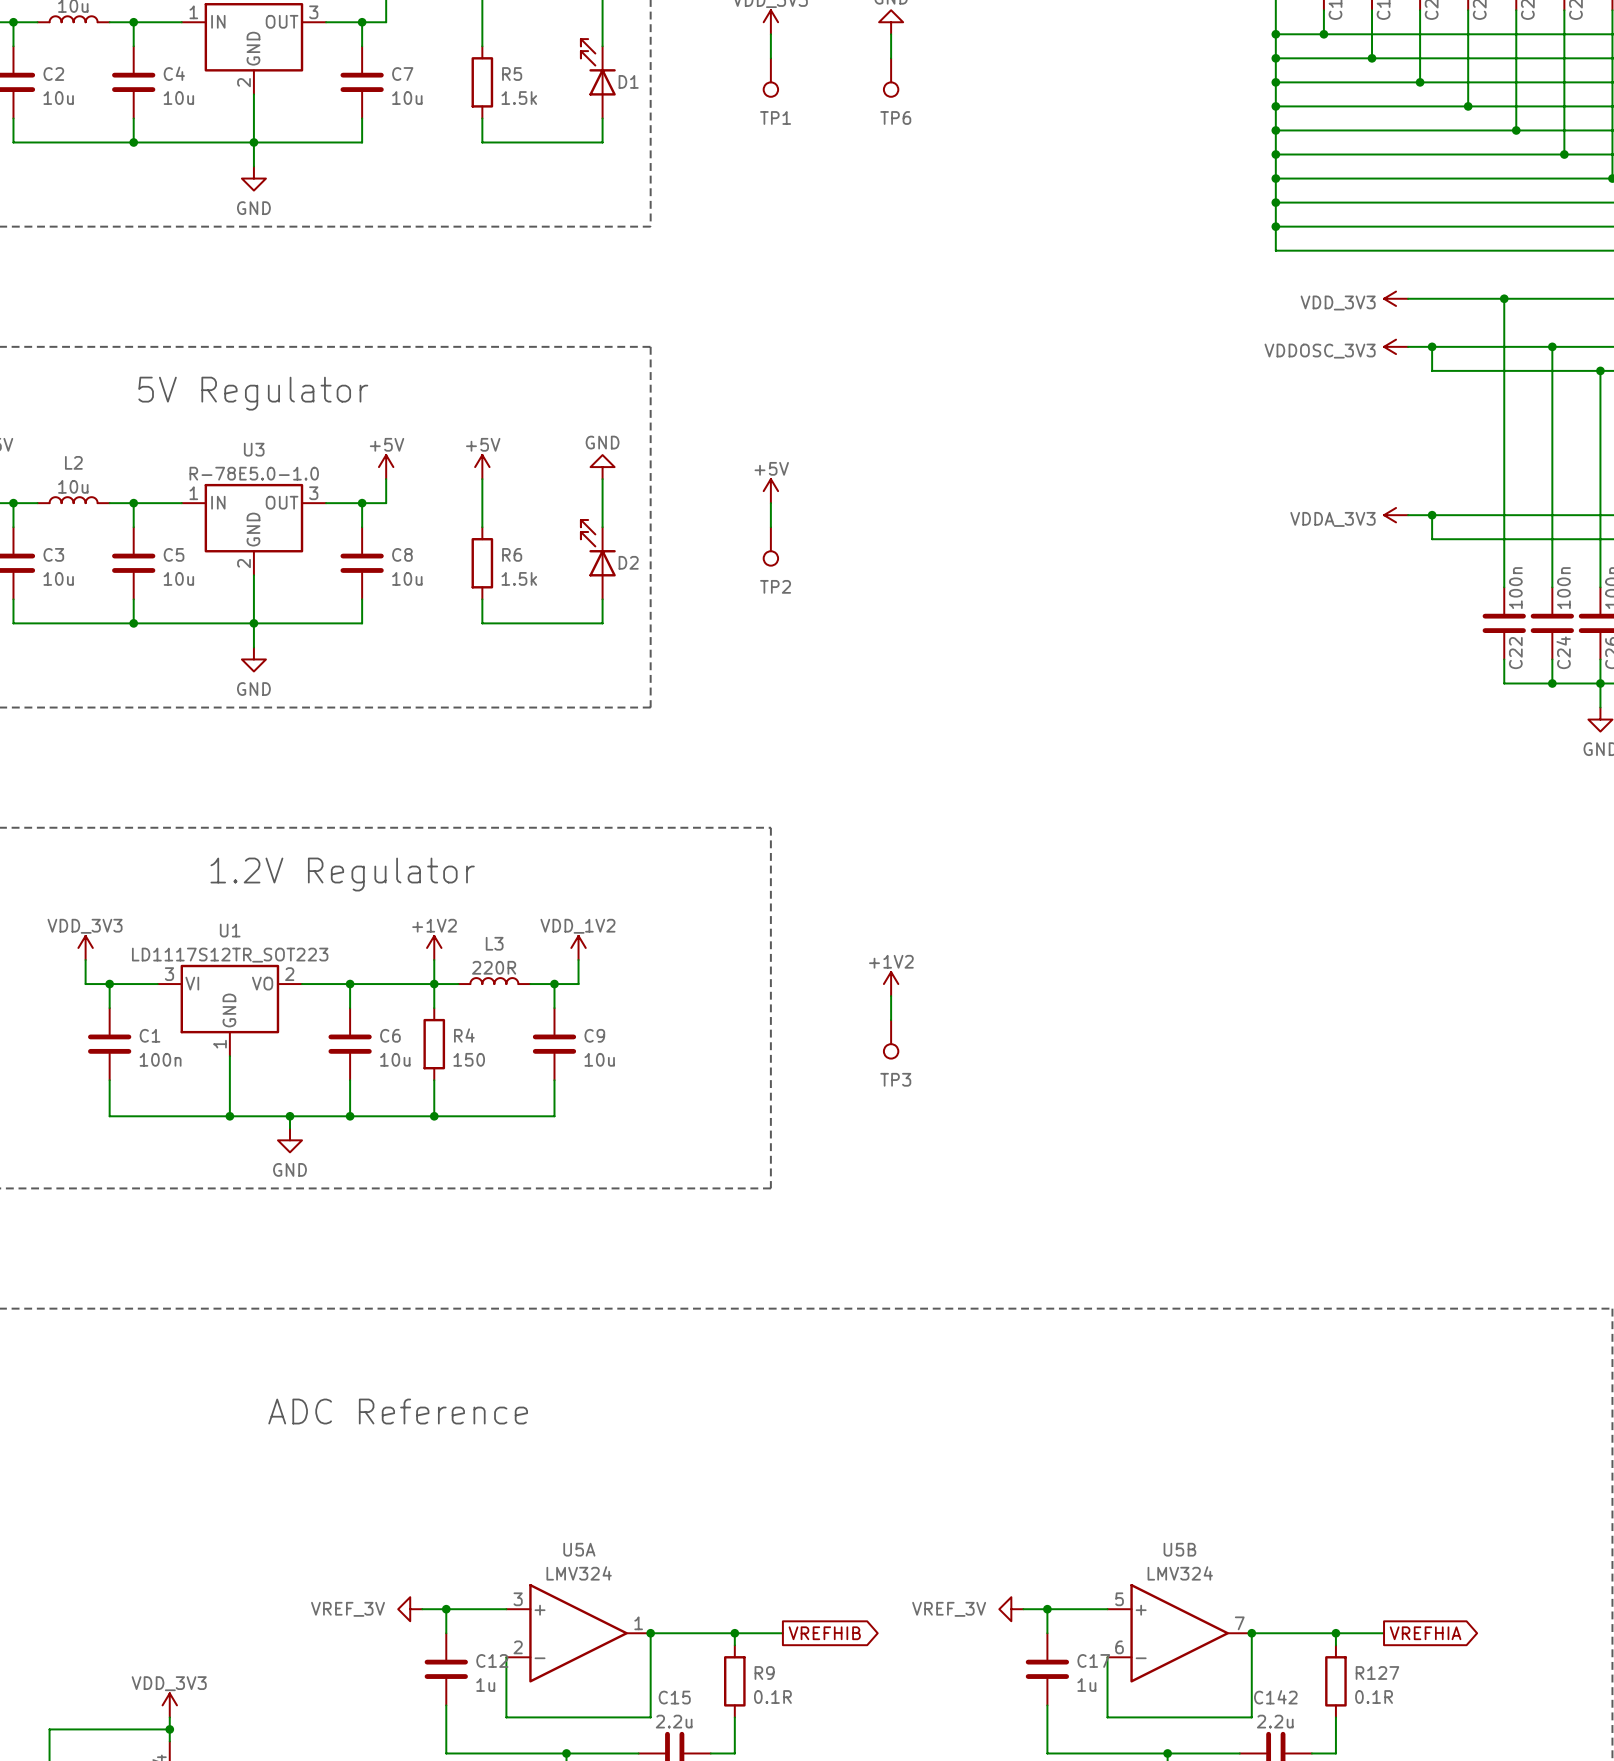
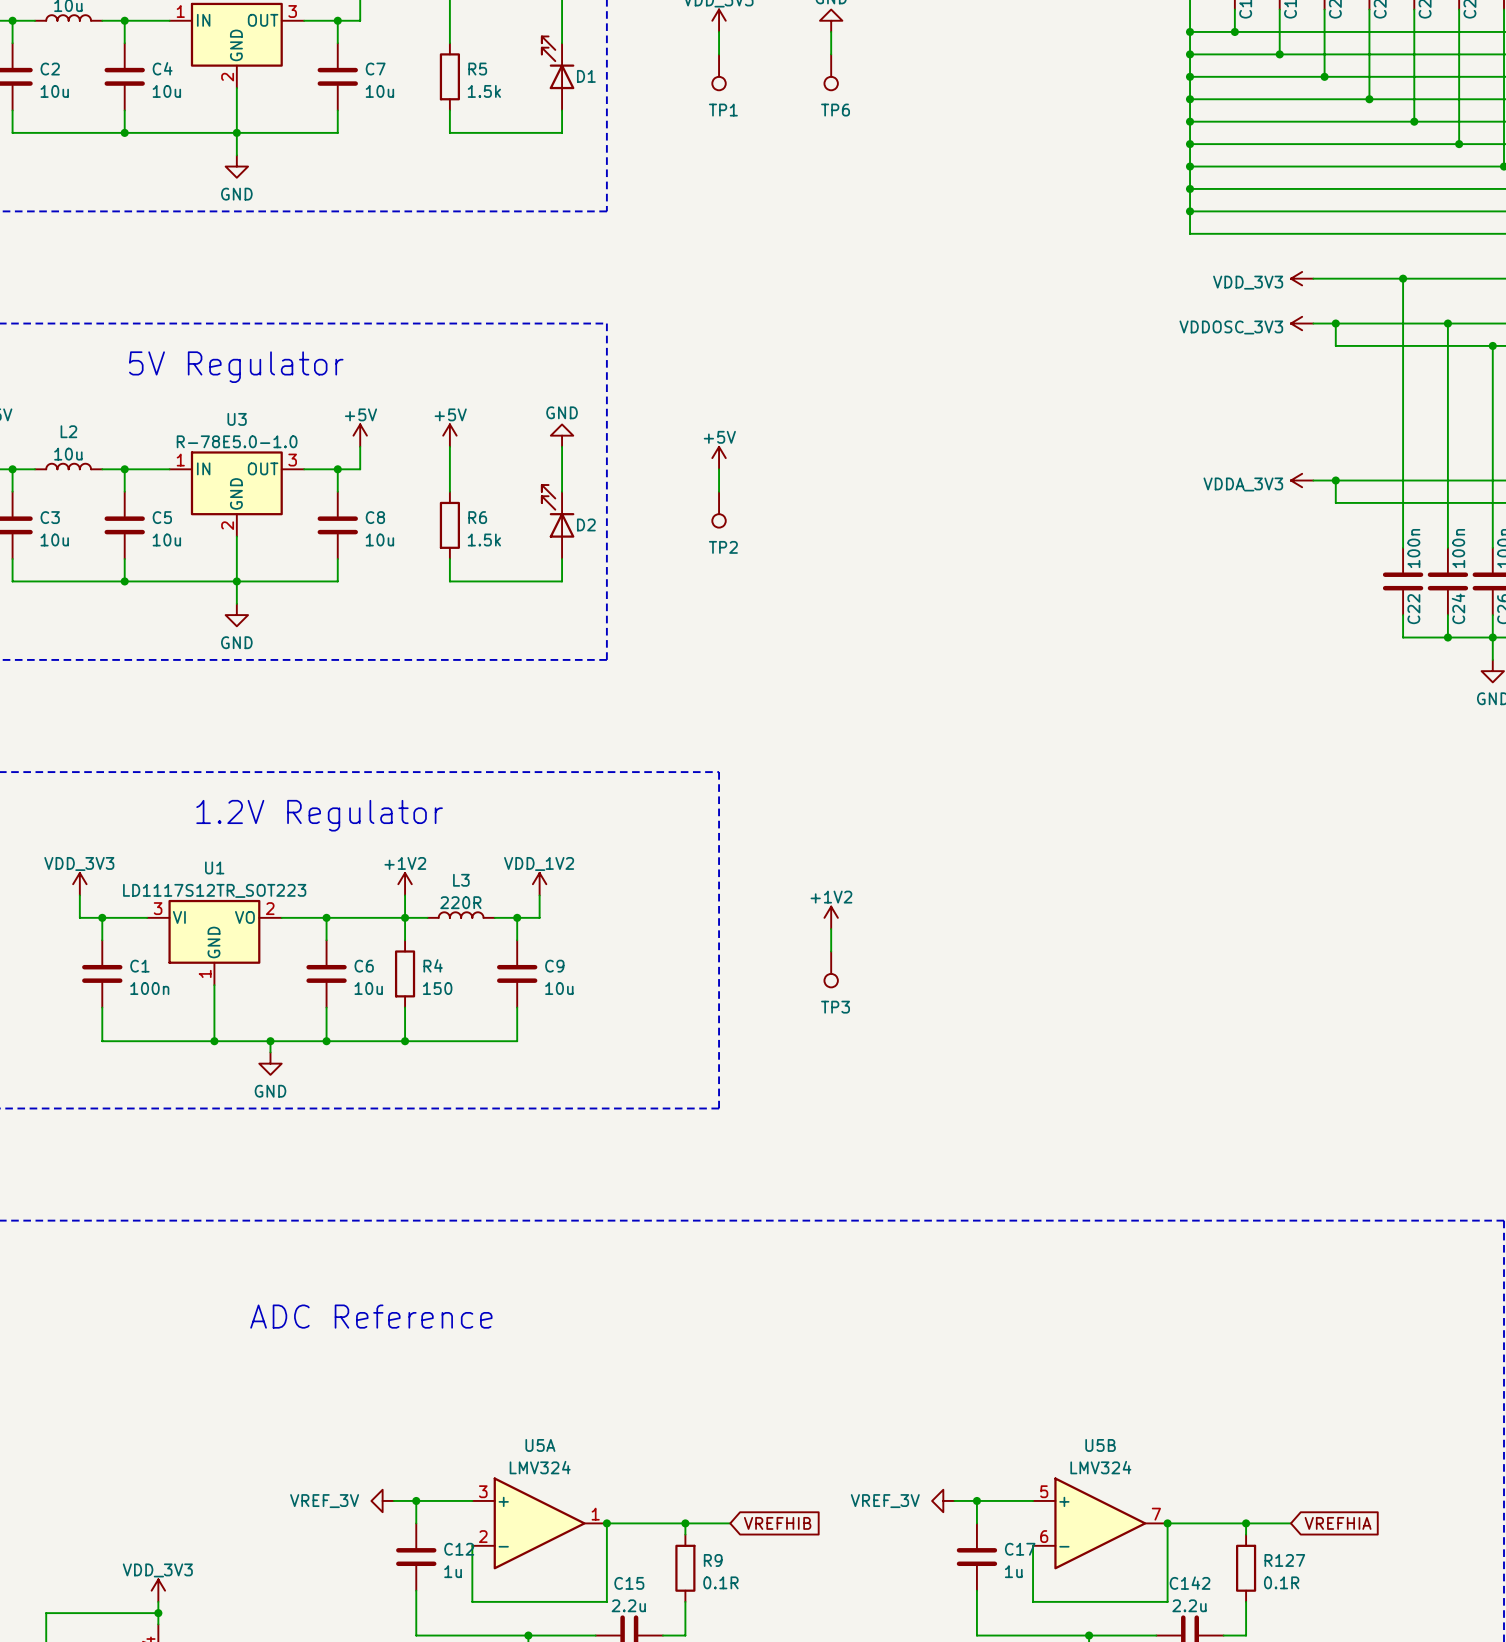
global label shape: output (824, 1633) -> input (777, 1523)
global label shape: output (1425, 1633) -> input (1338, 1523)

